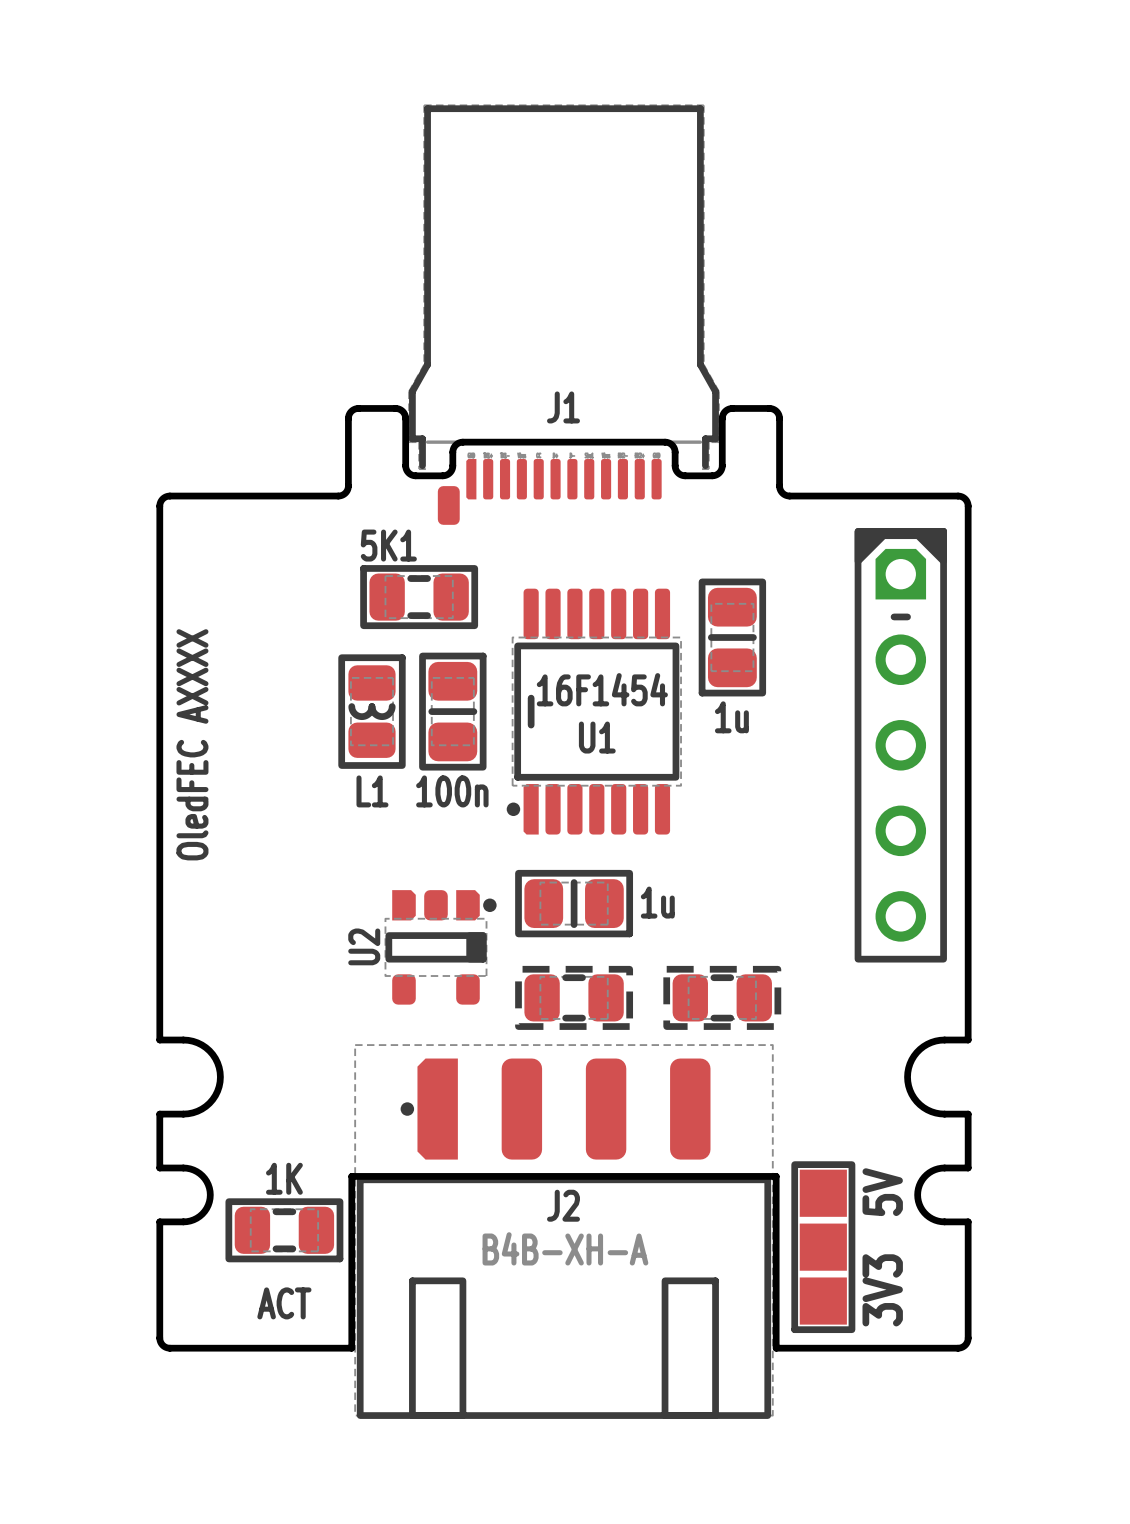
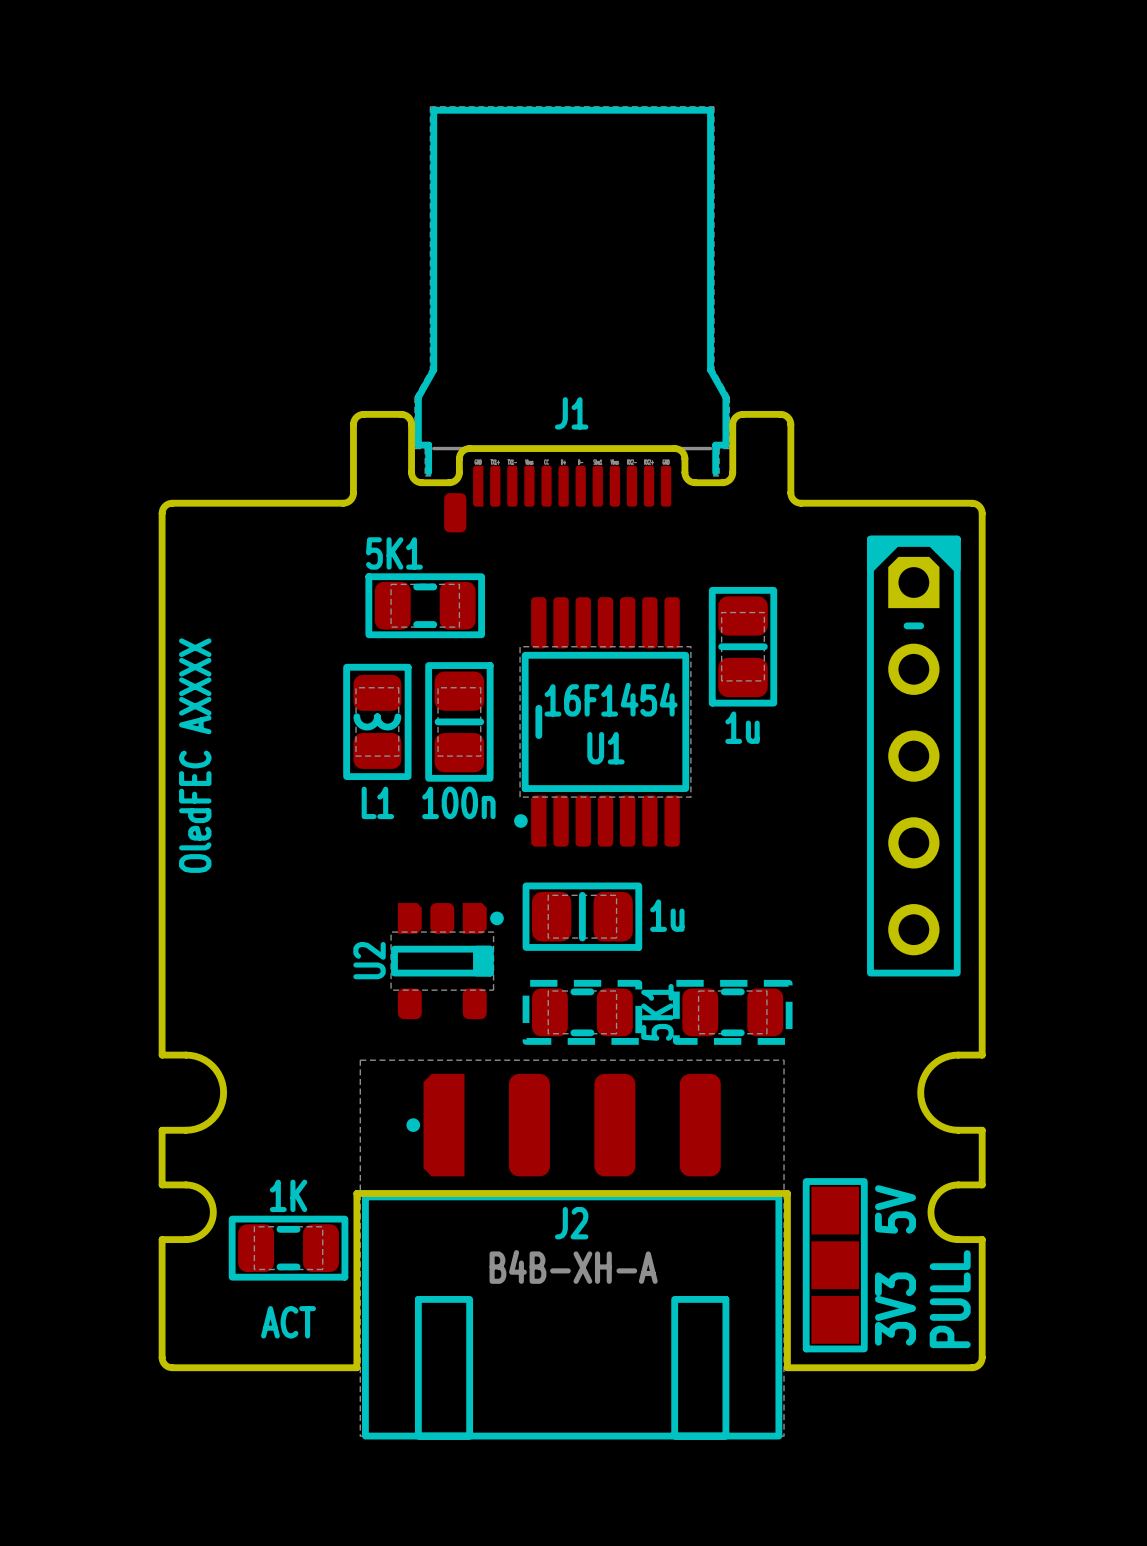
part value: none -> 5K1 (657, 1012)
text: none -> PULL (950, 1299)

